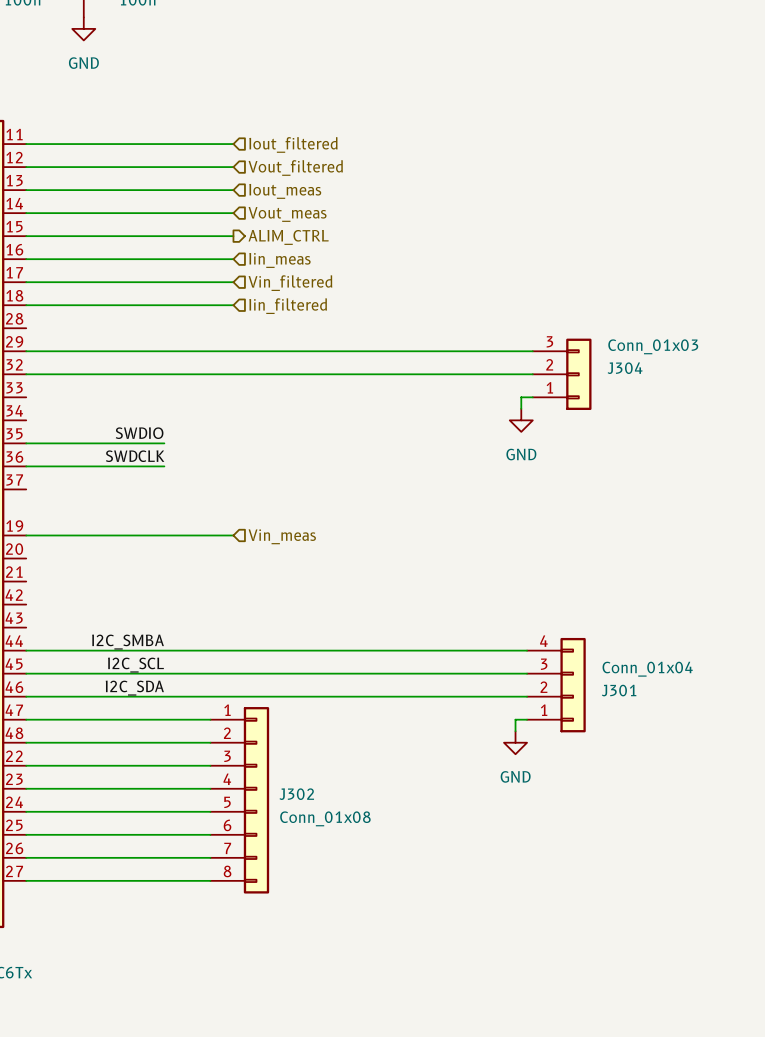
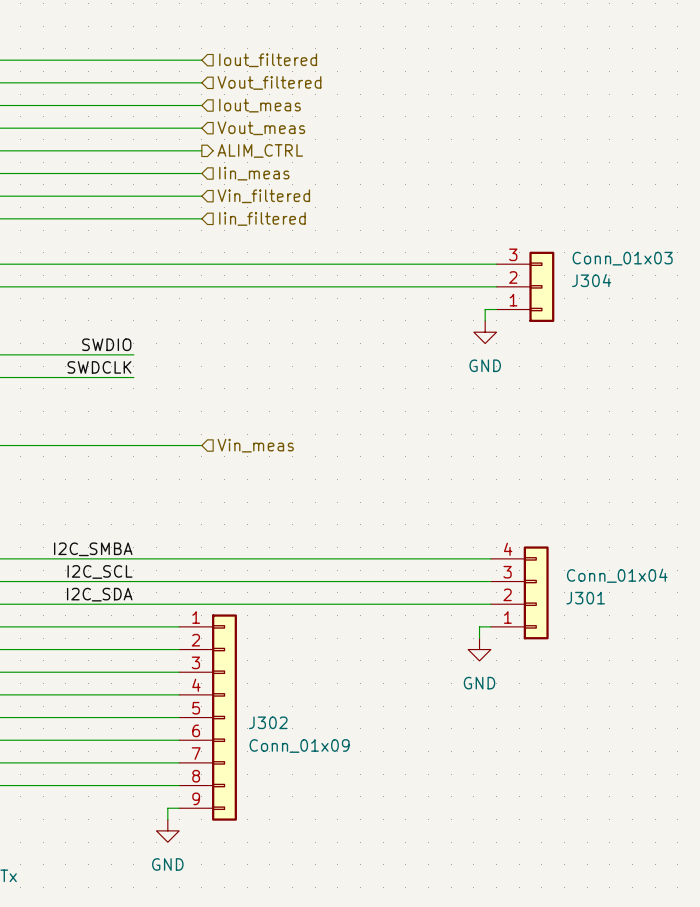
J302 symbol: [210, 707, 270, 894] -> [179, 614, 237, 821]
J302 value: Conn_01x08 (325, 818) -> Conn_01x09 (299, 746)
wire: none -> (179, 808) (167, 808) (167, 819)
power symbol: none -> GND (167, 830)

